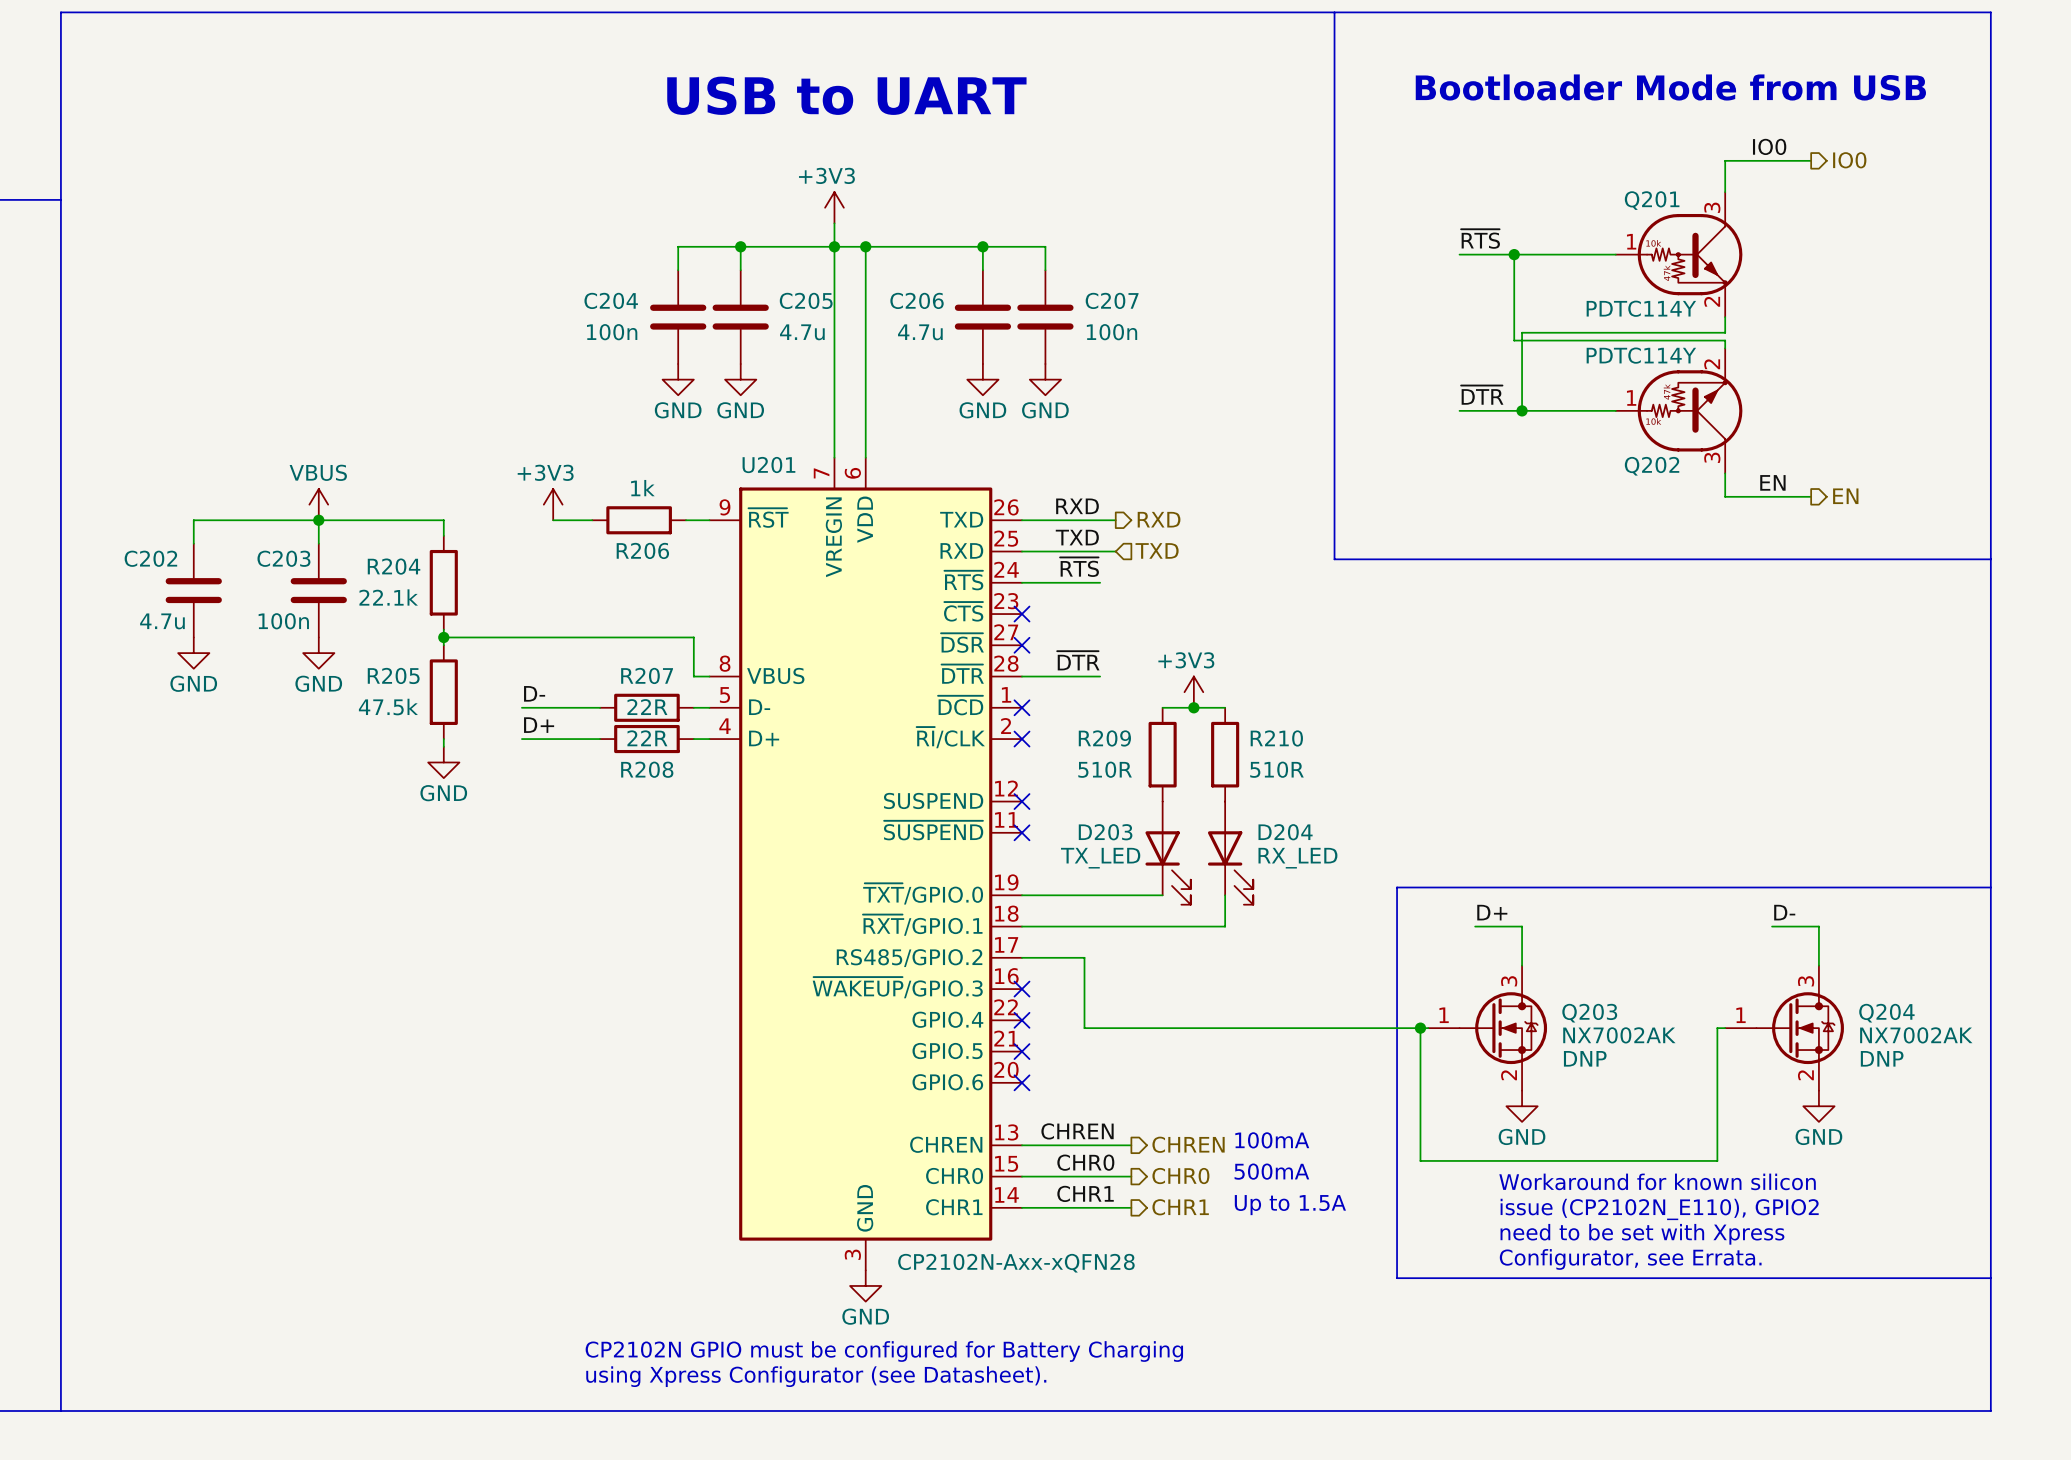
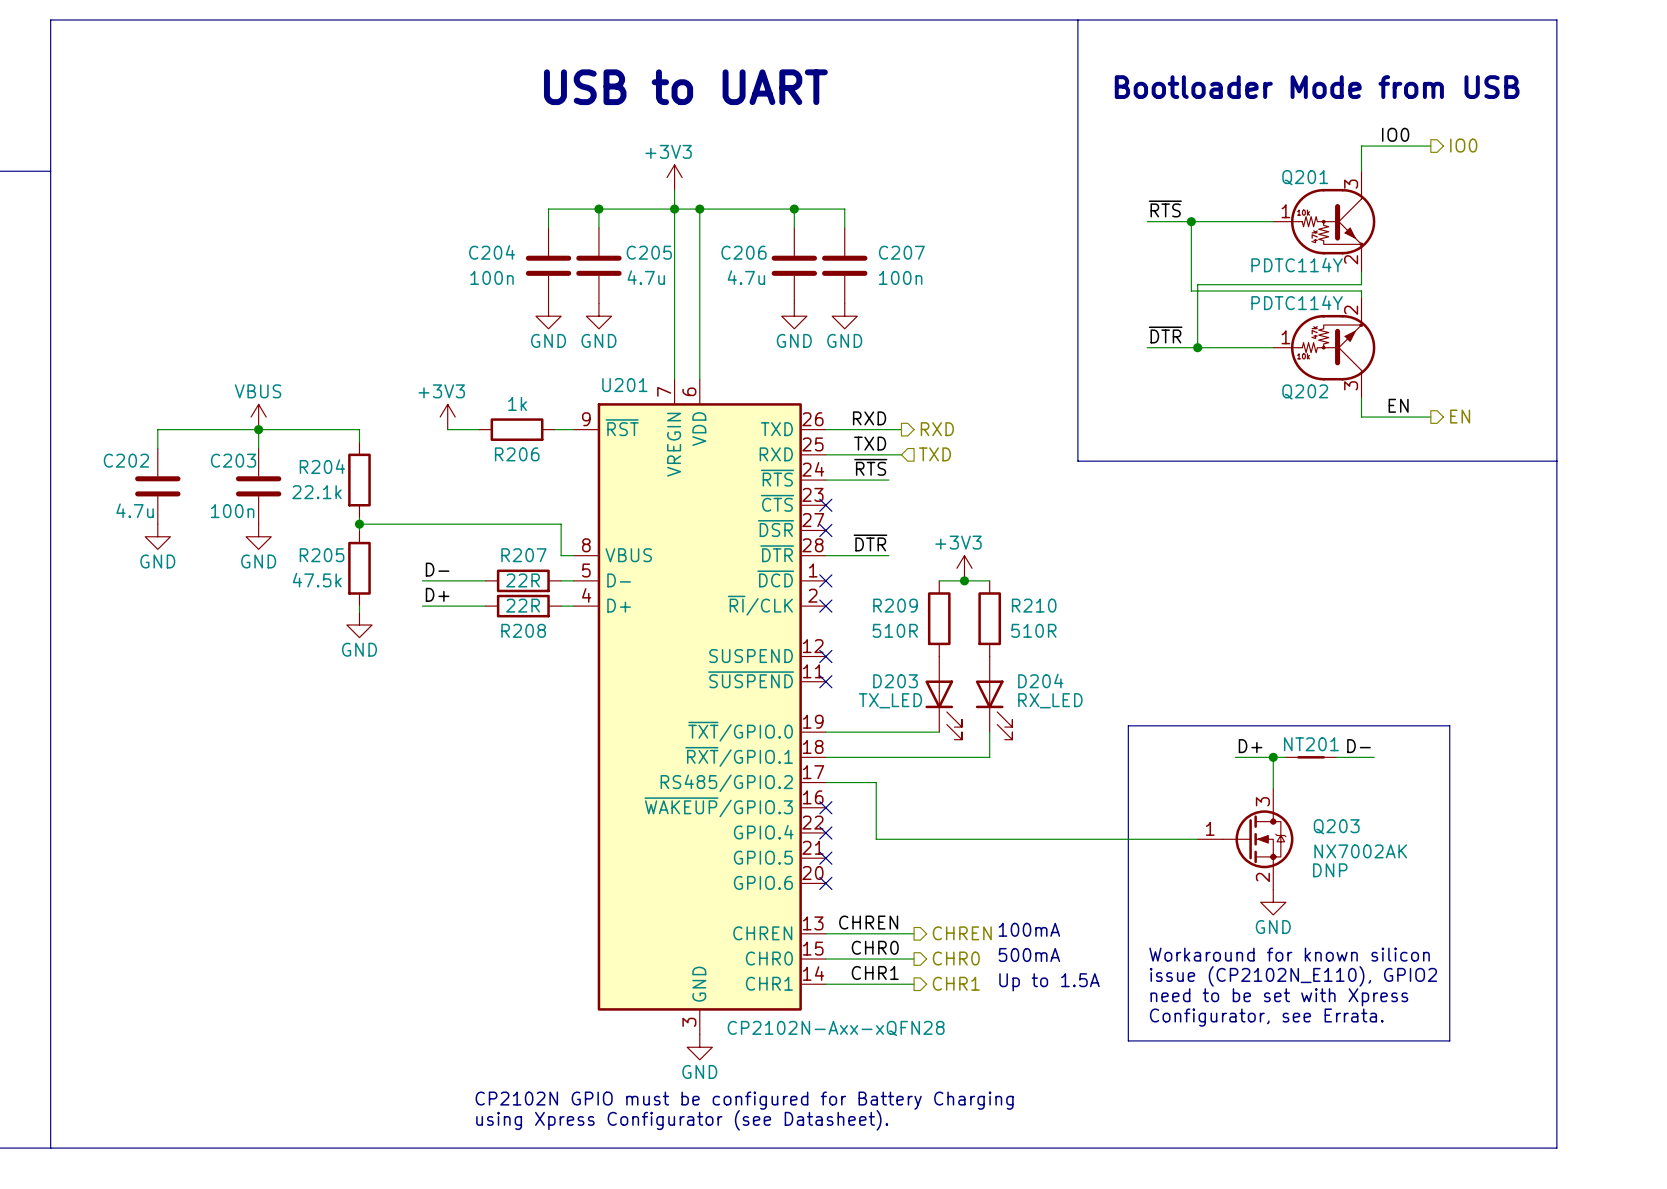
line: (1928, 12) (1990, 12) (1990, 1410) (1928, 1410) -> (1556, 20) (1556, 1148)
text position: Bootloader Mode from USB (1670, 87) -> Bootloader Mode from USB (1317, 87)
label position: IO0 (1769, 146) -> IO0 (1395, 134)
wire: (1811, 160) (1725, 160) (1725, 192) -> (1430, 146) (1361, 146) (1361, 171)
hierarchical label position: IO0 (1849, 160) -> IO0 (1463, 145)
label position: ~{RTS} (1480, 239) -> ~{RTS} (1165, 208)
wire: (1459, 254) (1615, 254) -> (1147, 221) (1273, 221)
wire: (1514, 254) (1514, 340) -> (1197, 347) (1197, 284) (1222, 284)
junction position: (1514, 254) -> (1191, 221)
Q201 position: (1679, 254) -> (1324, 221)
wire: none -> (1191, 221) (1191, 290) (1361, 290) (1361, 297)
wire: (1725, 317) (1725, 332) (1522, 332) (1522, 410) -> none
wire: (1686, 340) (1725, 340) (1725, 348) -> (1361, 284) (1361, 272)
label position: ~{DTR} (1482, 395) -> ~{DTR} (1165, 335)
wire: (1459, 410) (1615, 410) -> (1147, 347) (1273, 347)
junction position: (1522, 410) -> (1197, 347)
Q202 position: (1679, 410) -> (1324, 347)
wire: (1725, 473) (1725, 496) (1811, 496) -> (1361, 398) (1361, 417) (1430, 417)
label position: EN (1772, 482) -> EN (1398, 405)
hierarchical label position: EN (1845, 496) -> EN (1460, 416)
line: (1928, 559) (1990, 559) -> none
line: (1795, 887) (1990, 887) -> (1449, 725) (1449, 1040)
label position: D+ (1492, 912) -> D+ (1250, 746)
label position: D- (1784, 912) -> D- (1359, 746)
wire: (1475, 926) (1522, 926) (1522, 965) -> none
wire: none -> (1235, 757) (1285, 757)
wire: none -> (1273, 757) (1273, 788)
junction: none -> (1273, 757)
NT201: none -> (1311, 757)
wire: none -> (1336, 757) (1374, 757)
wire: (1772, 926) (1818, 926) (1818, 965) -> none
Q203 name position: Q203 (1589, 1013) -> Q203 (1336, 826)
wire: (1420, 1028) (1420, 1160) (1717, 1160) (1717, 1028) (1725, 1028) -> none
junction: (1420, 1028) -> none
Q203 position: (1487, 1028) -> (1245, 839)
Q204: NX7002AK (1784, 1028) -> none
Q203 value position: NX7002AK (1619, 1035) -> NX7002AK (1360, 851)
Q203 text position: DNP (1585, 1058) -> DNP (1330, 870)
power symbol position: GND (1522, 1106) -> GND (1273, 902)
power symbol: GND (1818, 1106) -> none
text position: Workaround for known silicon (1657, 1181) -> Workaround for known silicon (1289, 954)
text position: issue (CP2102N_E110), GPIO2 (1659, 1209) -> issue (CP2102N_E110), GPIO2 (1293, 976)
text position: need to be set with Xpress (1642, 1234) -> need to be set with Xpress (1279, 997)
text position: Configurator, see Errata. (1630, 1259) -> Configurator, see Errata. (1266, 1017)
line: (1795, 1278) (1990, 1278) -> none

